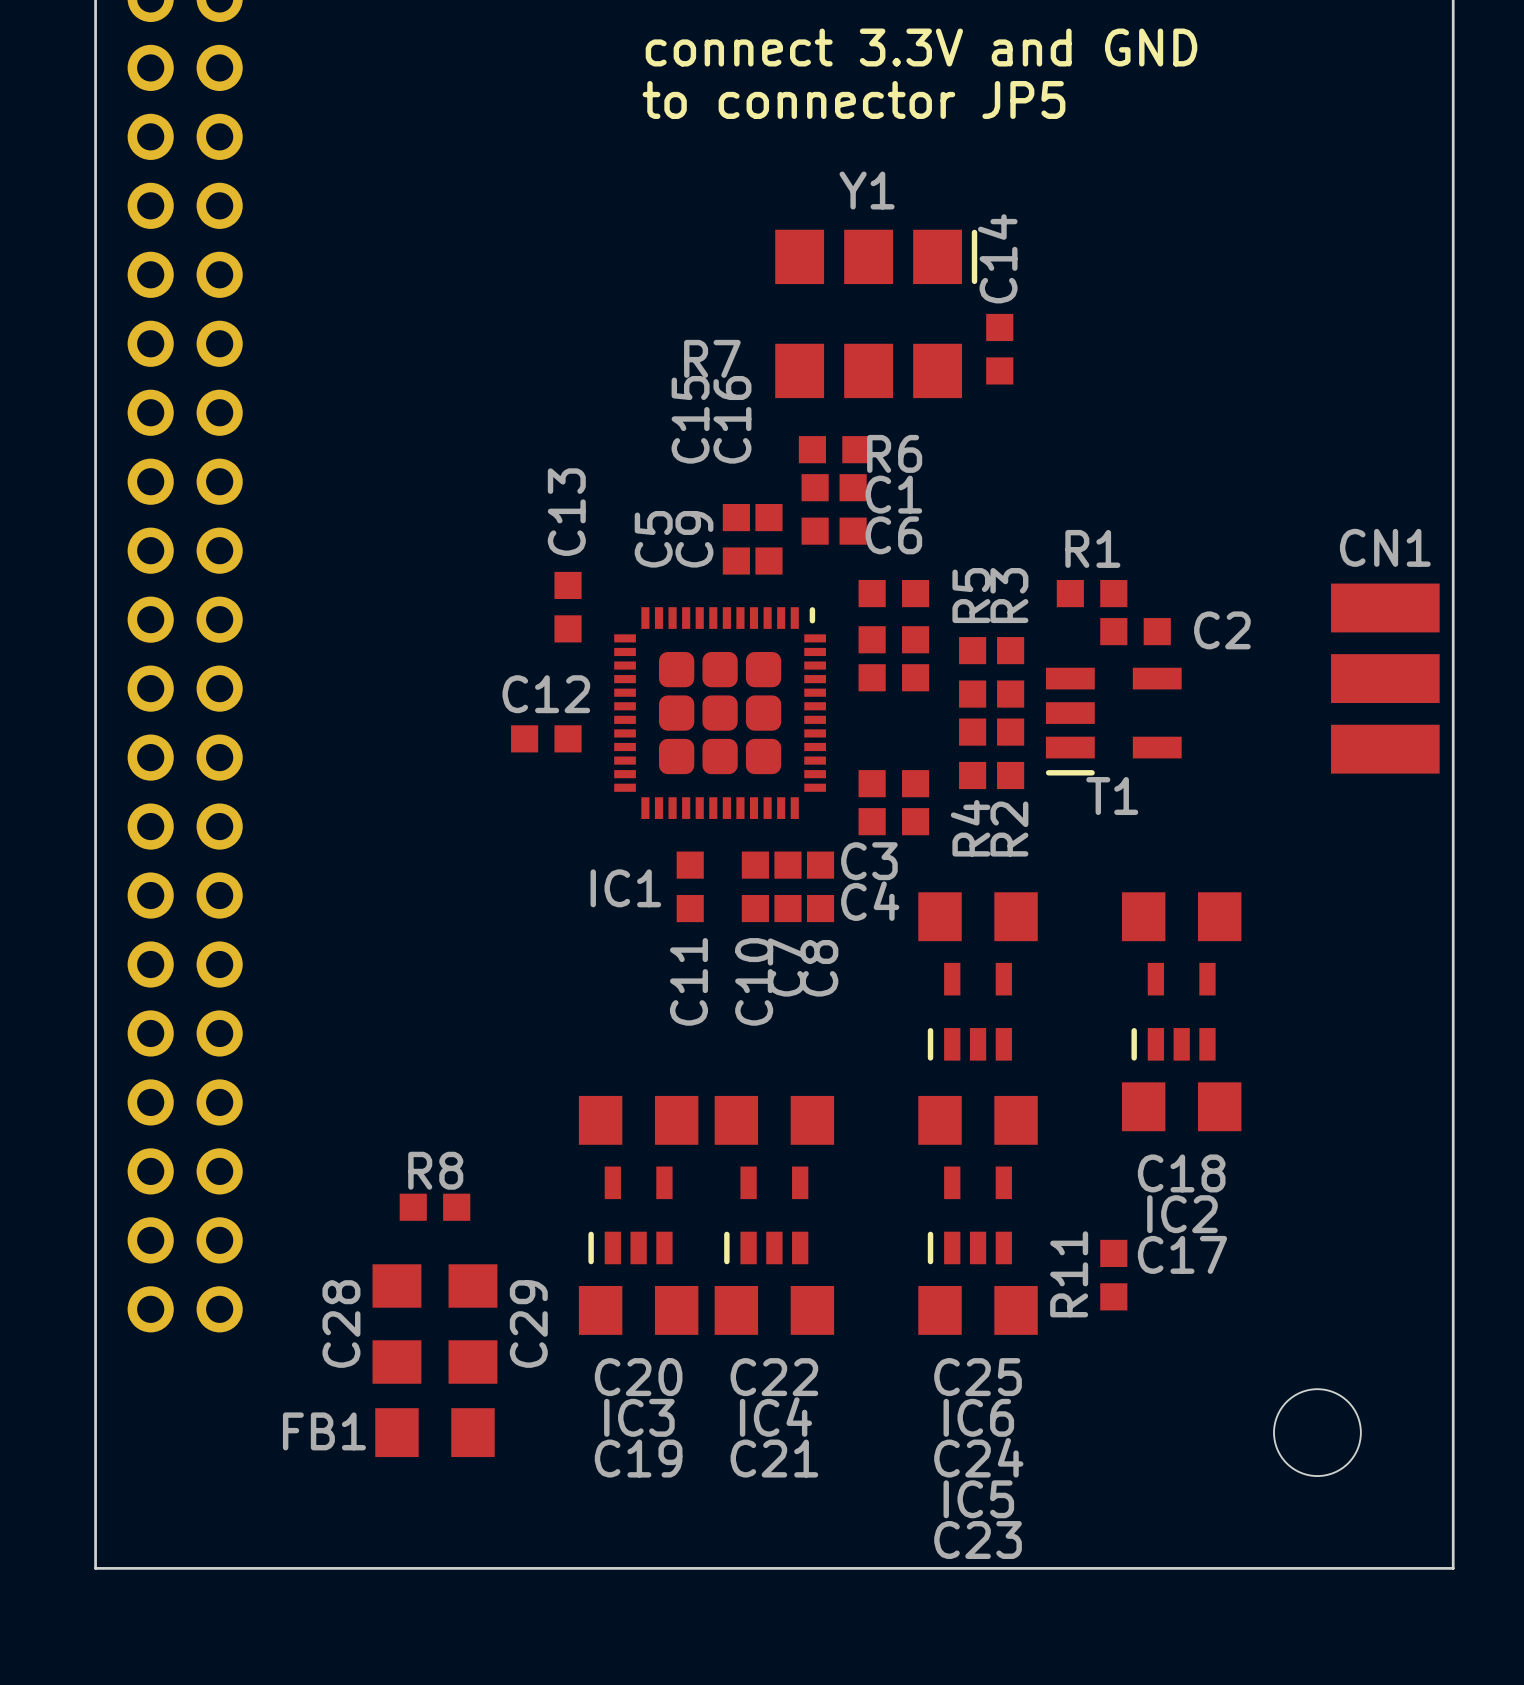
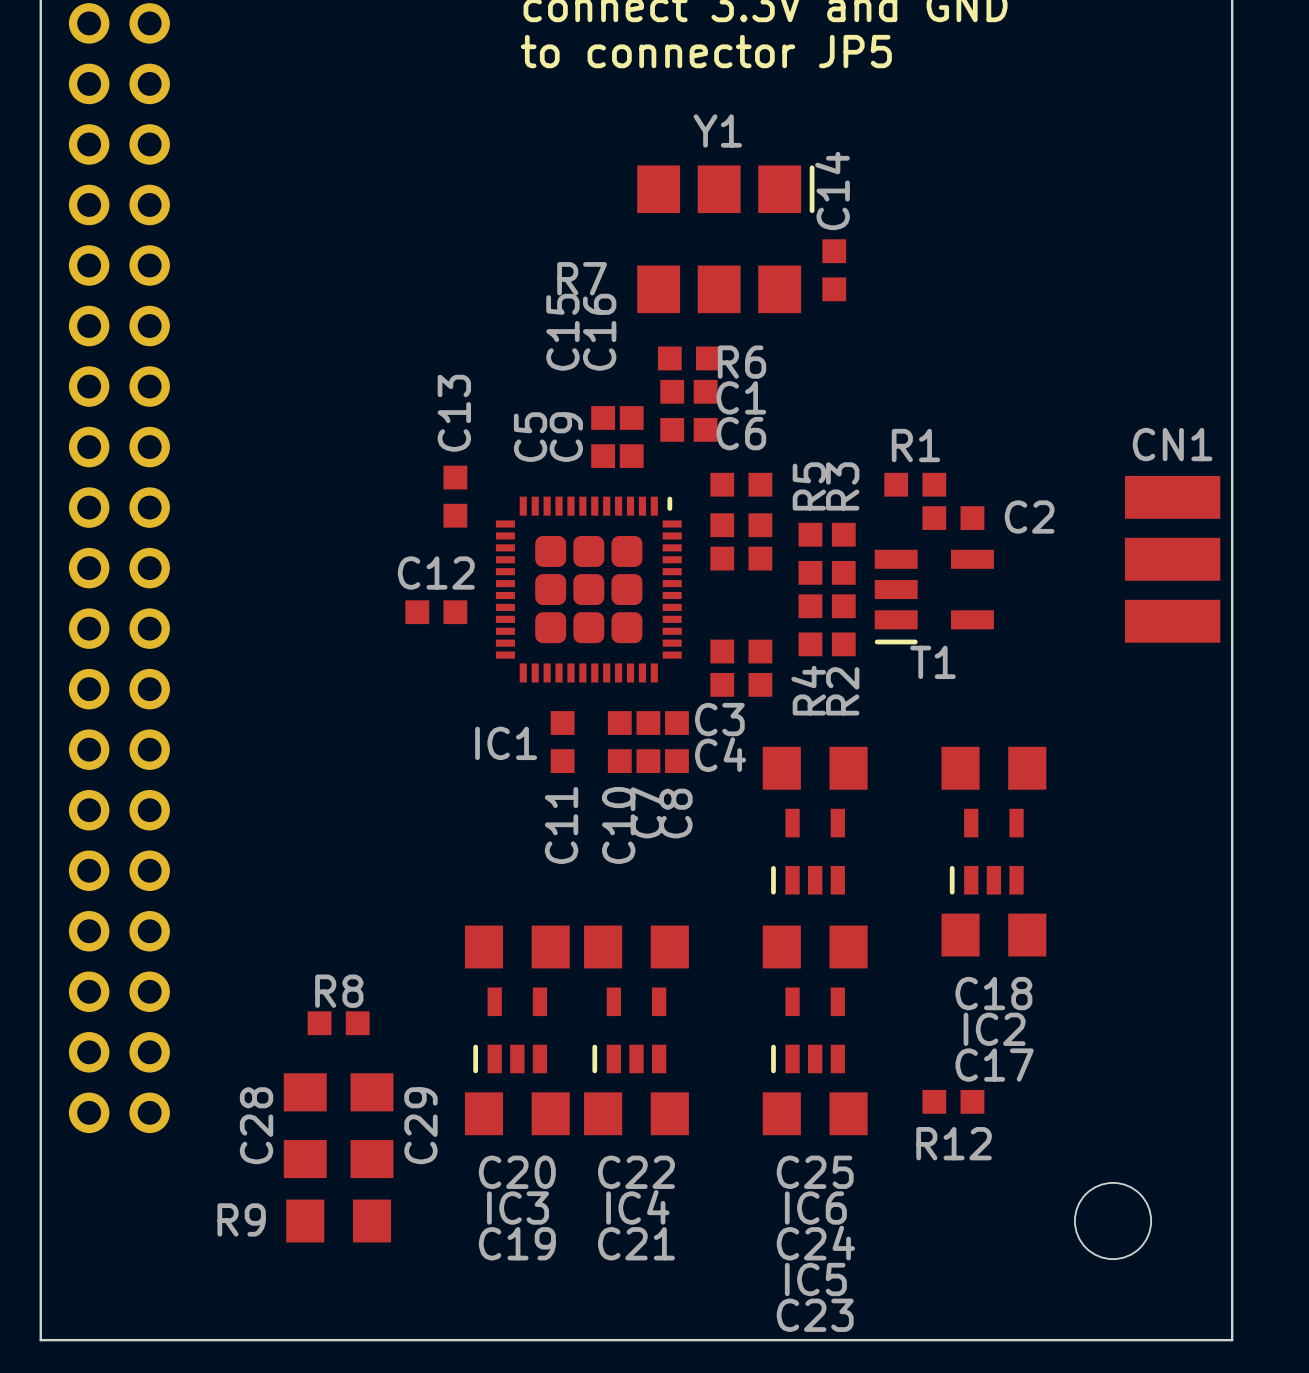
R11: (1113, 1275) -> none
R12: none -> (953, 1101)
FB1 name: FB1 (324, 1431) -> R9 (241, 1219)

